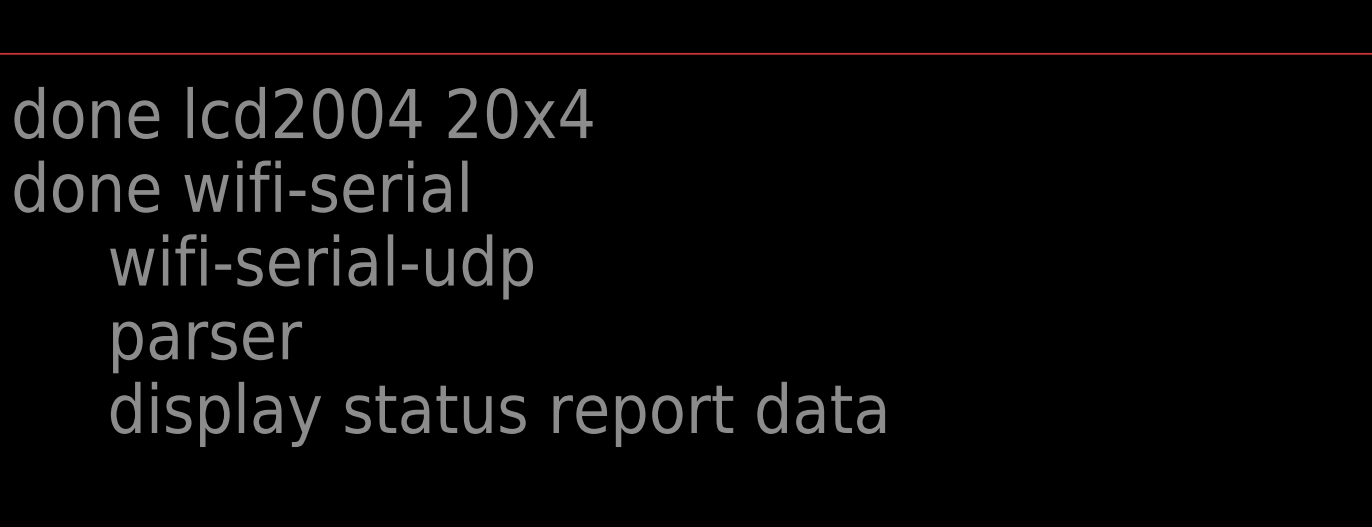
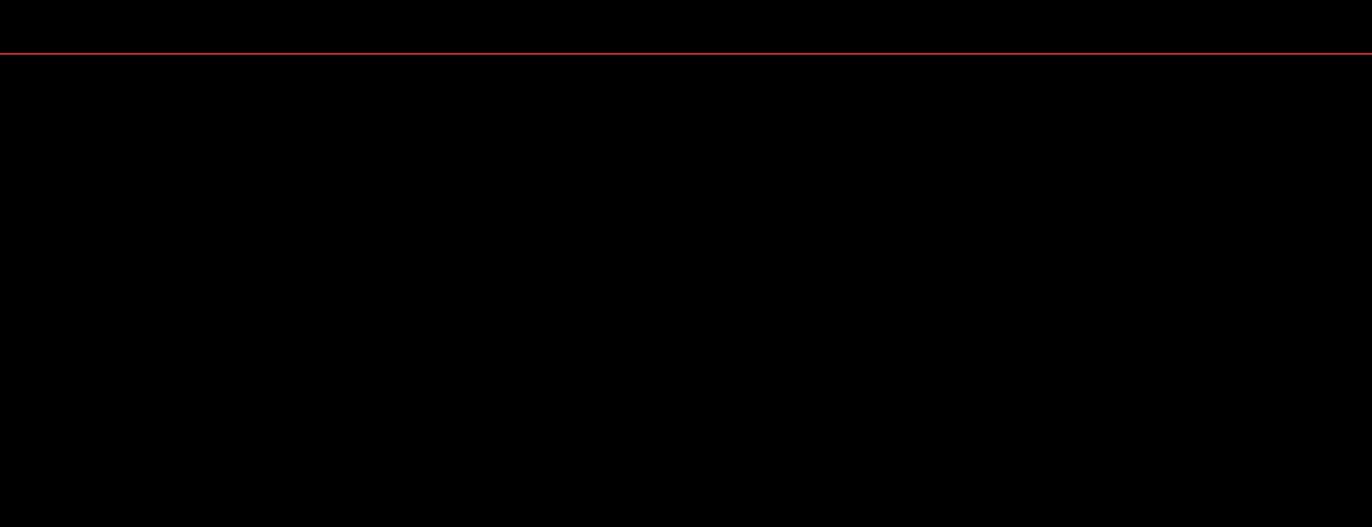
text: done lcd2004 20x4 (303, 112) -> none
text: done wifi-serial (240, 186) -> none
text: wifi-serial-udp (321, 266) -> none
text: parser (207, 347) -> none
text: display status report data (498, 414) -> none

